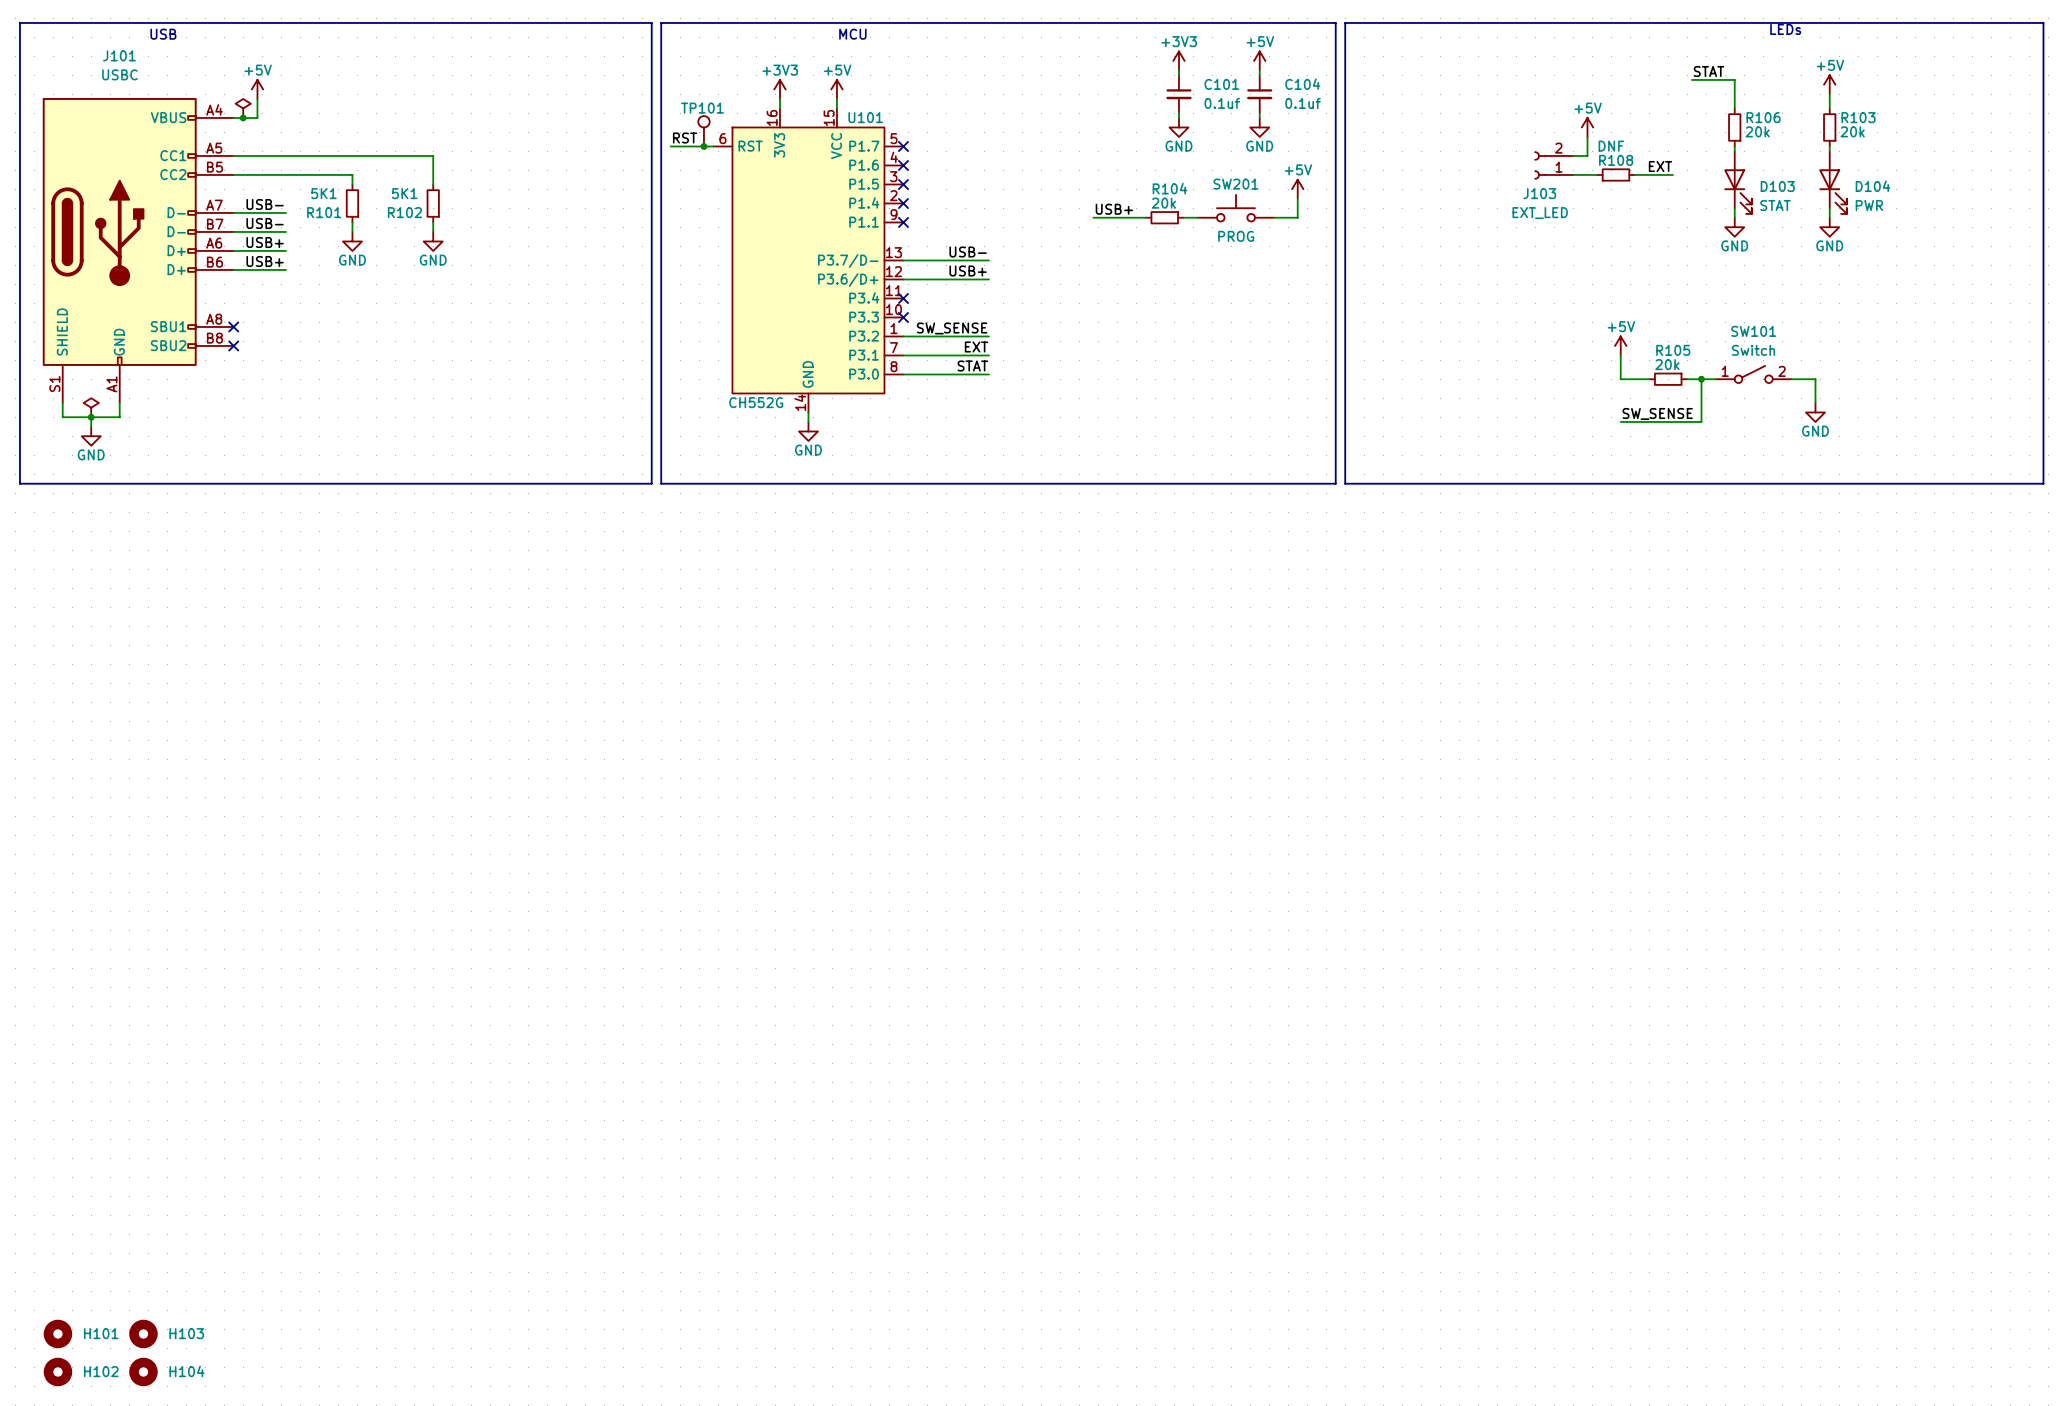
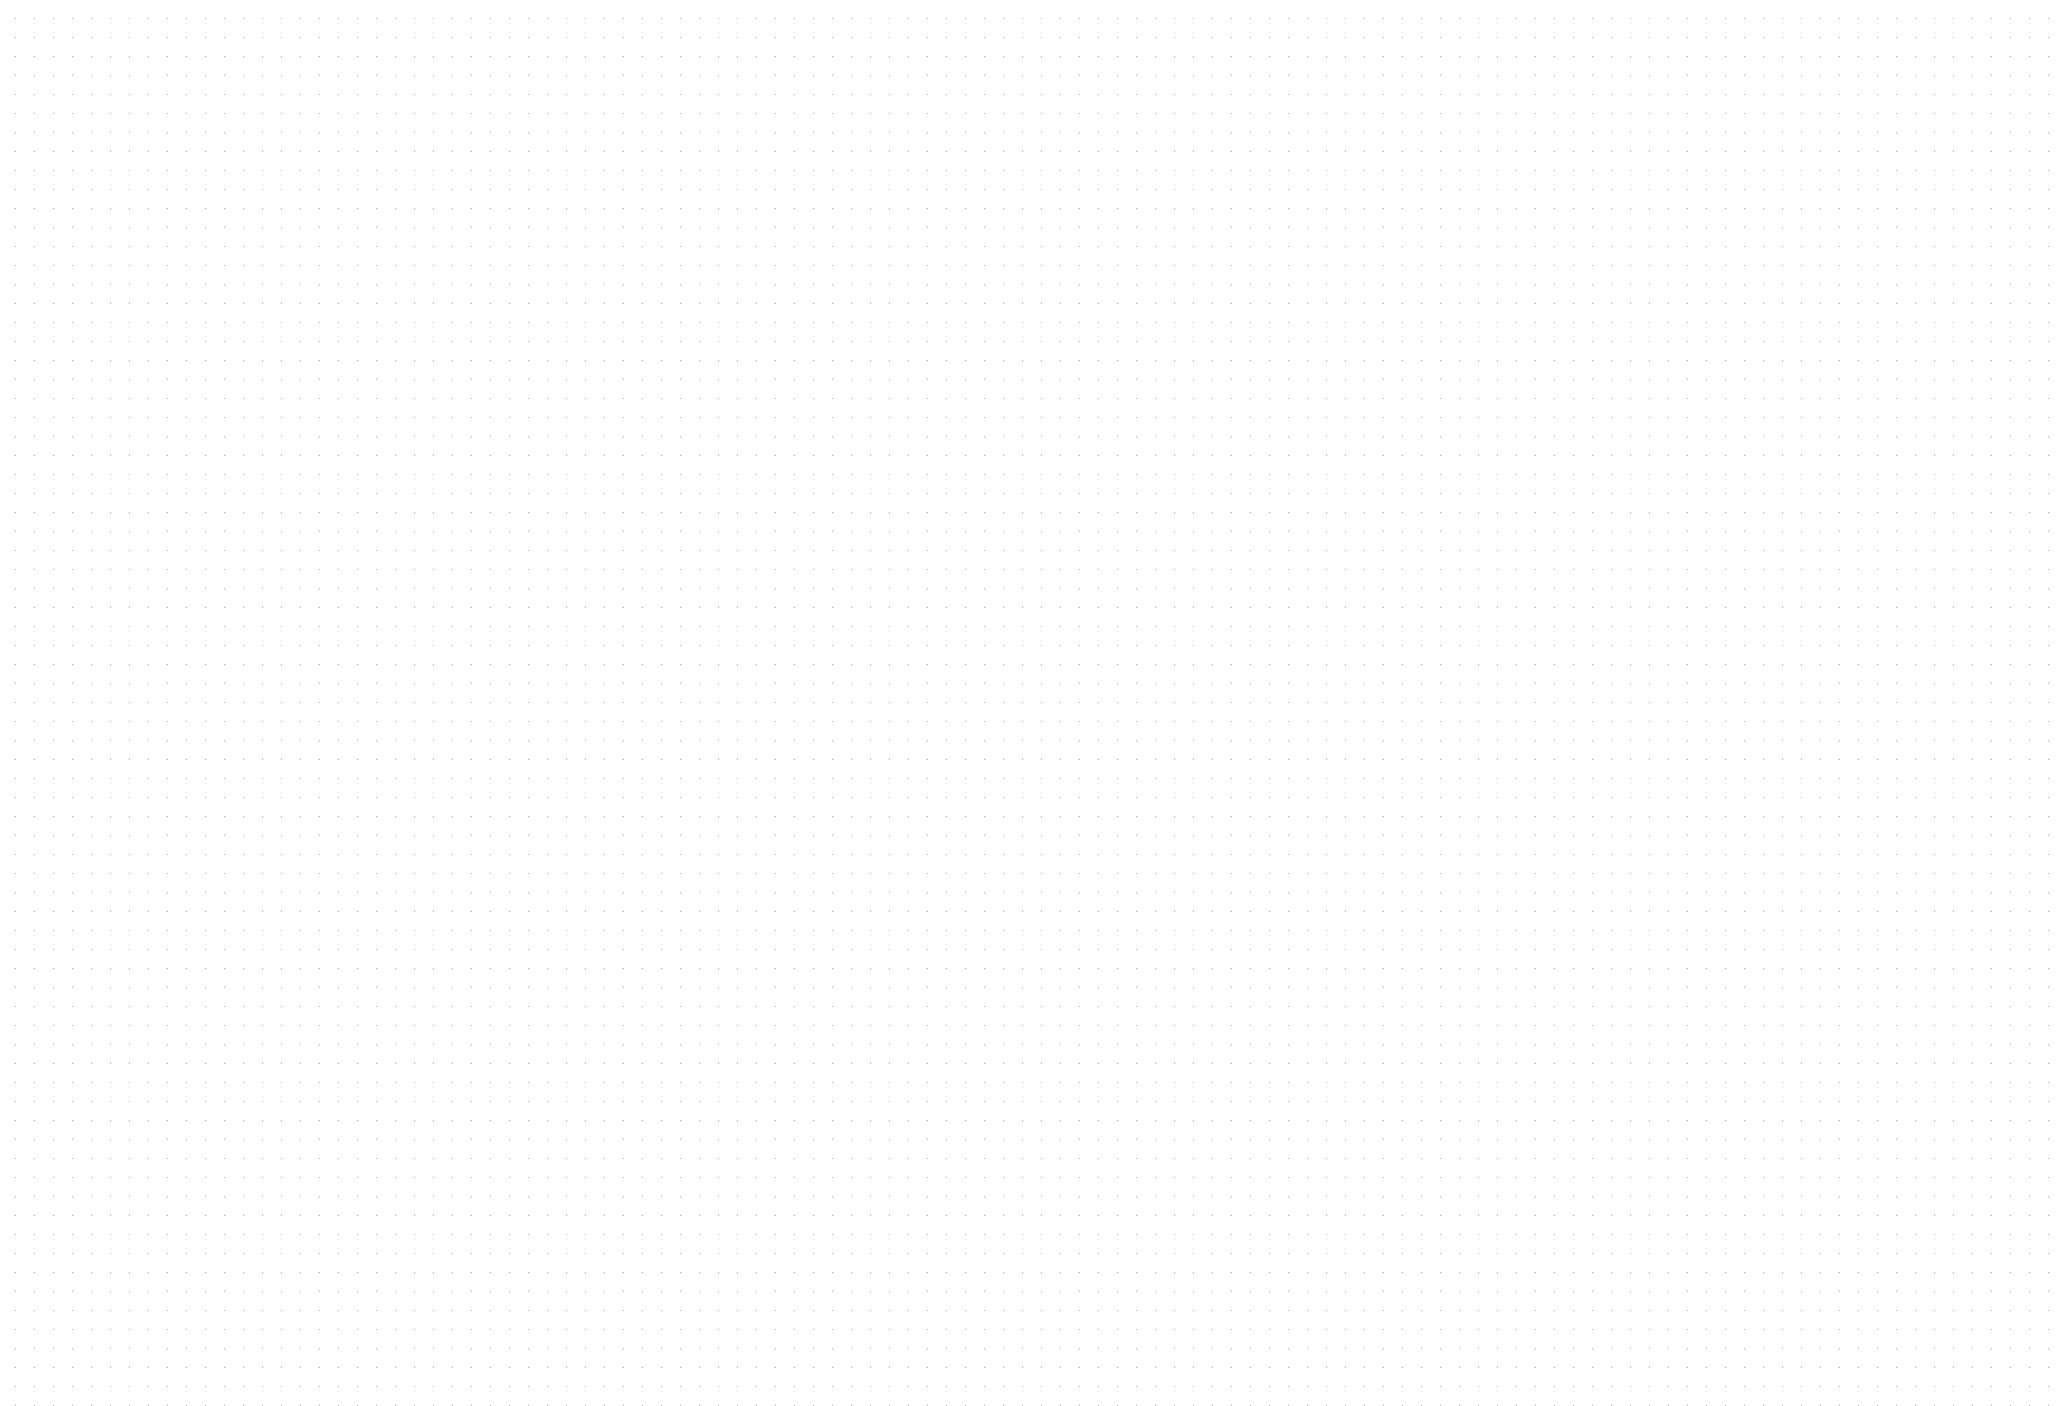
line: (19, 22) (651, 22) (651, 483) (19, 483) (19, 22) -> none
line: (661, 22) (1335, 22) (1335, 483) (661, 483) (661, 22) -> none
line: (1345, 22) (1345, 483) (2043, 483) (2043, 22) (1345, 22) -> none
text: LEDs (1785, 29) -> none
text: USB (163, 34) -> none
text: MCU (852, 34) -> none
power symbol: +3V3 (1178, 60) -> none
power symbol: +5V (1259, 60) -> none
wire: (1178, 70) (1178, 75) -> none
wire: (1259, 70) (1259, 75) -> none
label: STAT (1709, 71) -> none
wire: (1691, 79) (1734, 79) (1734, 108) -> none
power symbol: +5V (1829, 84) -> none
power symbol: +5V (257, 89) -> none
power symbol: +3V3 (779, 89) -> none
power symbol: +5V (836, 89) -> none
C101: 0.1uf (1178, 94) -> none
C104: 0.1uf (1259, 94) -> none
wire: (1829, 94) (1829, 108) -> none
wire: (257, 98) (257, 117) (233, 117) -> none
wire: (779, 98) (779, 108) -> none
wire: (836, 98) (836, 108) -> none
power symbol: (243, 108) -> none
wire: (1178, 113) (1178, 117) -> none
wire: (1259, 113) (1259, 117) -> none
junction: (243, 117) -> none
power symbol: GND (1178, 127) -> none
power symbol: GND (1259, 127) -> none
power symbol: +5V (1587, 127) -> none
R106: 20k (1734, 127) -> none
R103: 20k (1829, 127) -> none
TP101: (703, 131) -> none
wire: (1587, 136) (1587, 155) (1573, 155) -> none
label: RST (685, 138) -> none
wire: (670, 146) (713, 146) -> none
junction: (703, 146) -> none
no-connect mark: (903, 146) -> none
wire: (1734, 146) (1734, 151) -> none
wire: (1829, 146) (1829, 151) -> none
wire: (233, 155) (433, 155) (433, 184) -> none
no-connect mark: (903, 165) -> none
J103: EXT_LED (1553, 165) -> none
label: EXT (1660, 166) -> none
wire: (233, 174) (352, 174) (352, 184) -> none
wire: (1573, 174) (1596, 174) -> none
R108: DNF (1615, 174) -> none
wire: (1634, 174) (1672, 174) -> none
D103: STAT (1738, 182) -> none
D104: PWR (1833, 182) -> none
no-connect mark: (903, 184) -> none
power symbol: +5V (1297, 189) -> none
wire: (1297, 198) (1297, 217) (1273, 217) -> none
R101: 5K1 (352, 203) -> none
R102: 5K1 (433, 203) -> none
no-connect mark: (903, 203) -> none
label: USB- (265, 204) -> none
SW201: PROG (1235, 208) -> none
wire: (1734, 208) (1734, 217) -> none
wire: (1829, 208) (1829, 217) -> none
label: USB+ (1114, 209) -> none
wire: (233, 212) (285, 212) -> none
wire: (1093, 217) (1145, 217) -> none
R104: 20k (1164, 217) -> none
wire: (1183, 217) (1197, 217) -> none
wire: (352, 222) (352, 231) -> none
wire: (433, 222) (433, 231) -> none
no-connect mark: (903, 222) -> none
label: USB- (265, 223) -> none
power symbol: GND (1734, 227) -> none
power symbol: GND (1829, 227) -> none
wire: (233, 231) (285, 231) -> none
power symbol: GND (352, 241) -> none
power symbol: GND (433, 241) -> none
label: USB+ (265, 242) -> none
J101: USBC (138, 250) -> none
wire: (233, 250) (285, 250) -> none
label: USB- (968, 252) -> none
U101: CH552G (808, 260) -> none
wire: (903, 260) (988, 260) -> none
label: USB+ (265, 261) -> none
wire: (233, 269) (285, 269) -> none
label: USB+ (968, 271) -> none
wire: (903, 279) (988, 279) -> none
no-connect mark: (903, 298) -> none
no-connect mark: (903, 317) -> none
no-connect mark: (233, 326) -> none
label: SW_SENSE (952, 328) -> none
wire: (903, 336) (988, 336) -> none
no-connect mark: (233, 345) -> none
power symbol: +5V (1620, 345) -> none
label: EXT (976, 347) -> none
wire: (903, 355) (988, 355) -> none
wire: (1620, 355) (1620, 379) (1649, 379) -> none
label: STAT (972, 366) -> none
wire: (903, 374) (988, 374) -> none
SW101: Switch (1753, 374) -> none
R105: 20k (1668, 379) -> none
wire: (1687, 379) (1715, 379) -> none
wire: (1701, 379) (1701, 421) (1620, 421) -> none
junction: (1701, 379) -> none
wire: (1791, 379) (1815, 379) (1815, 402) -> none
wire: (62, 402) (62, 417) (119, 417) (119, 402) -> none
power symbol: (91, 407) -> none
wire: (808, 412) (808, 421) -> none
power symbol: GND (1815, 412) -> none
label: SW_SENSE (1657, 413) -> none
wire: (91, 417) (91, 426) -> none
junction: (91, 417) -> none
power symbol: GND (808, 431) -> none
power symbol: GND (91, 436) -> none
H101: (57, 1333) -> none
H103: (143, 1333) -> none
H102: (57, 1371) -> none
H104: (143, 1371) -> none

